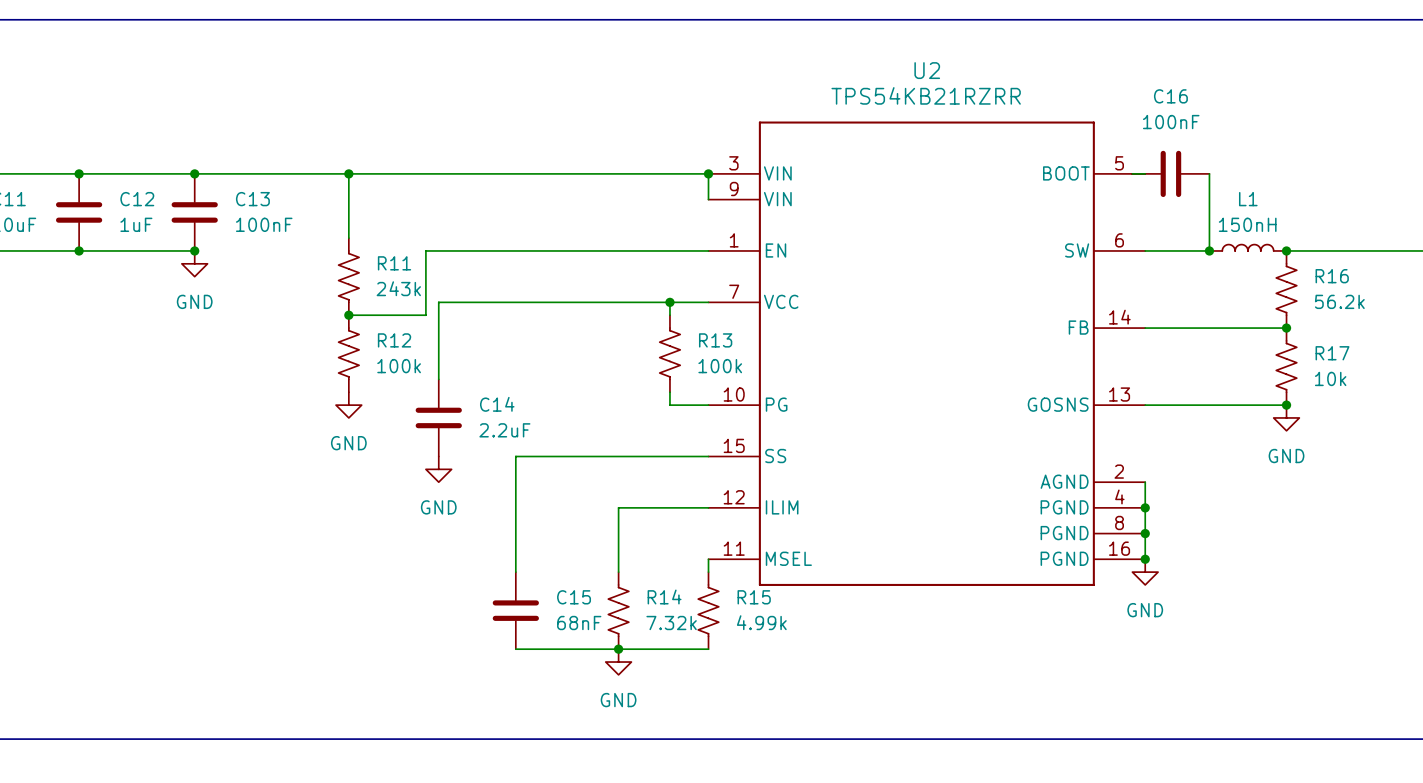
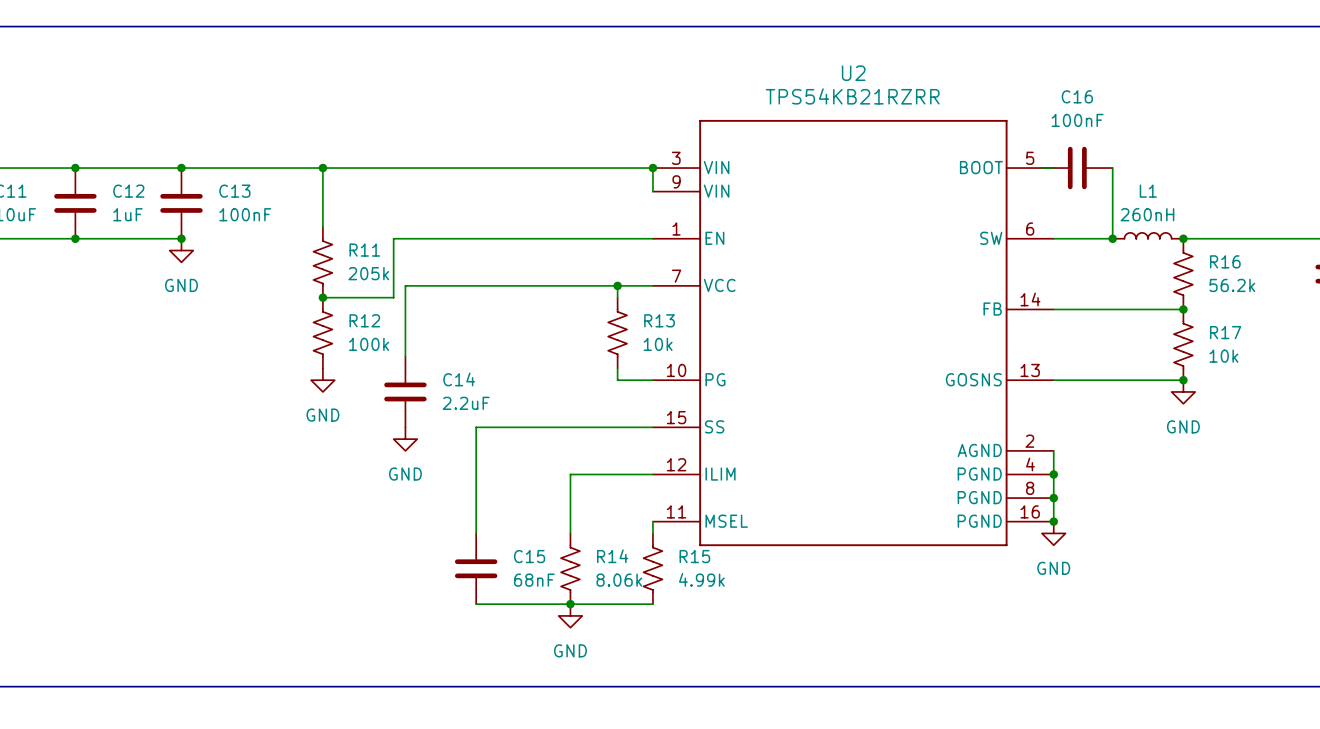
L1 value: 150nH (1247, 224) -> 260nH (1147, 214)
R11 value: 243k (398, 288) -> 205k (368, 273)
R13 value: 100k (720, 366) -> 10k (658, 344)
R14 value: 7.32k (671, 623) -> 8.06k (619, 580)

